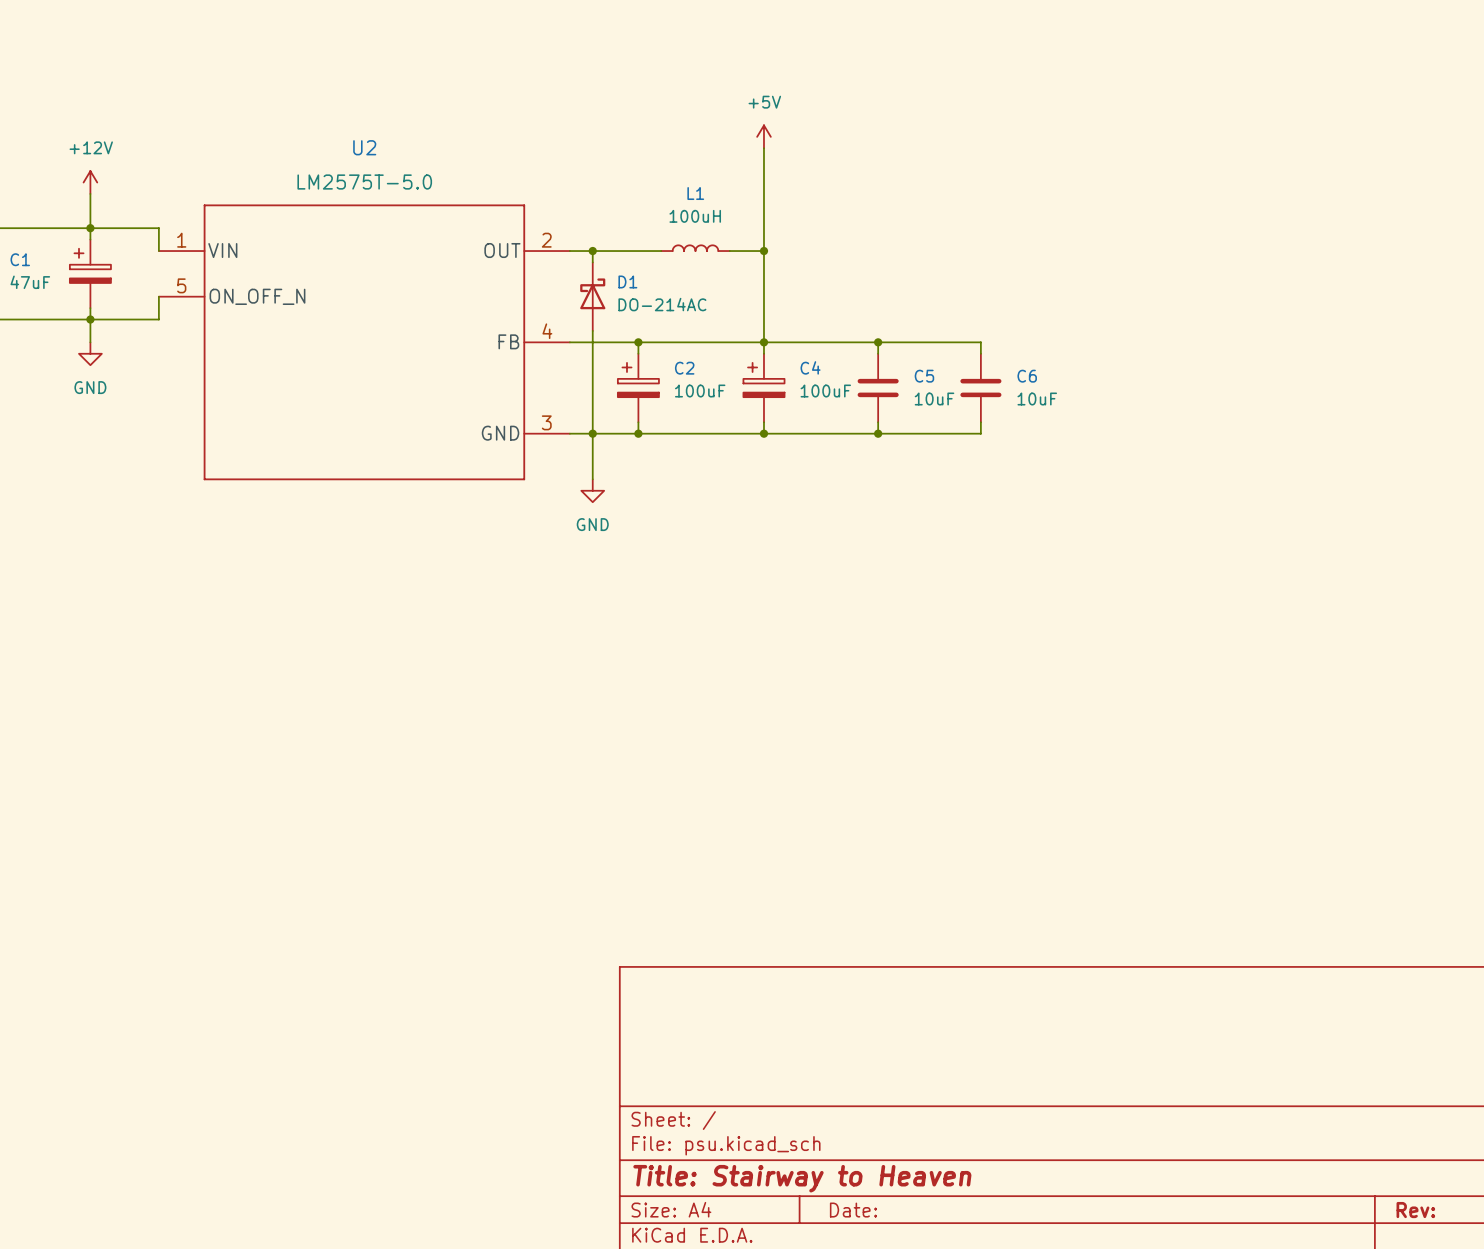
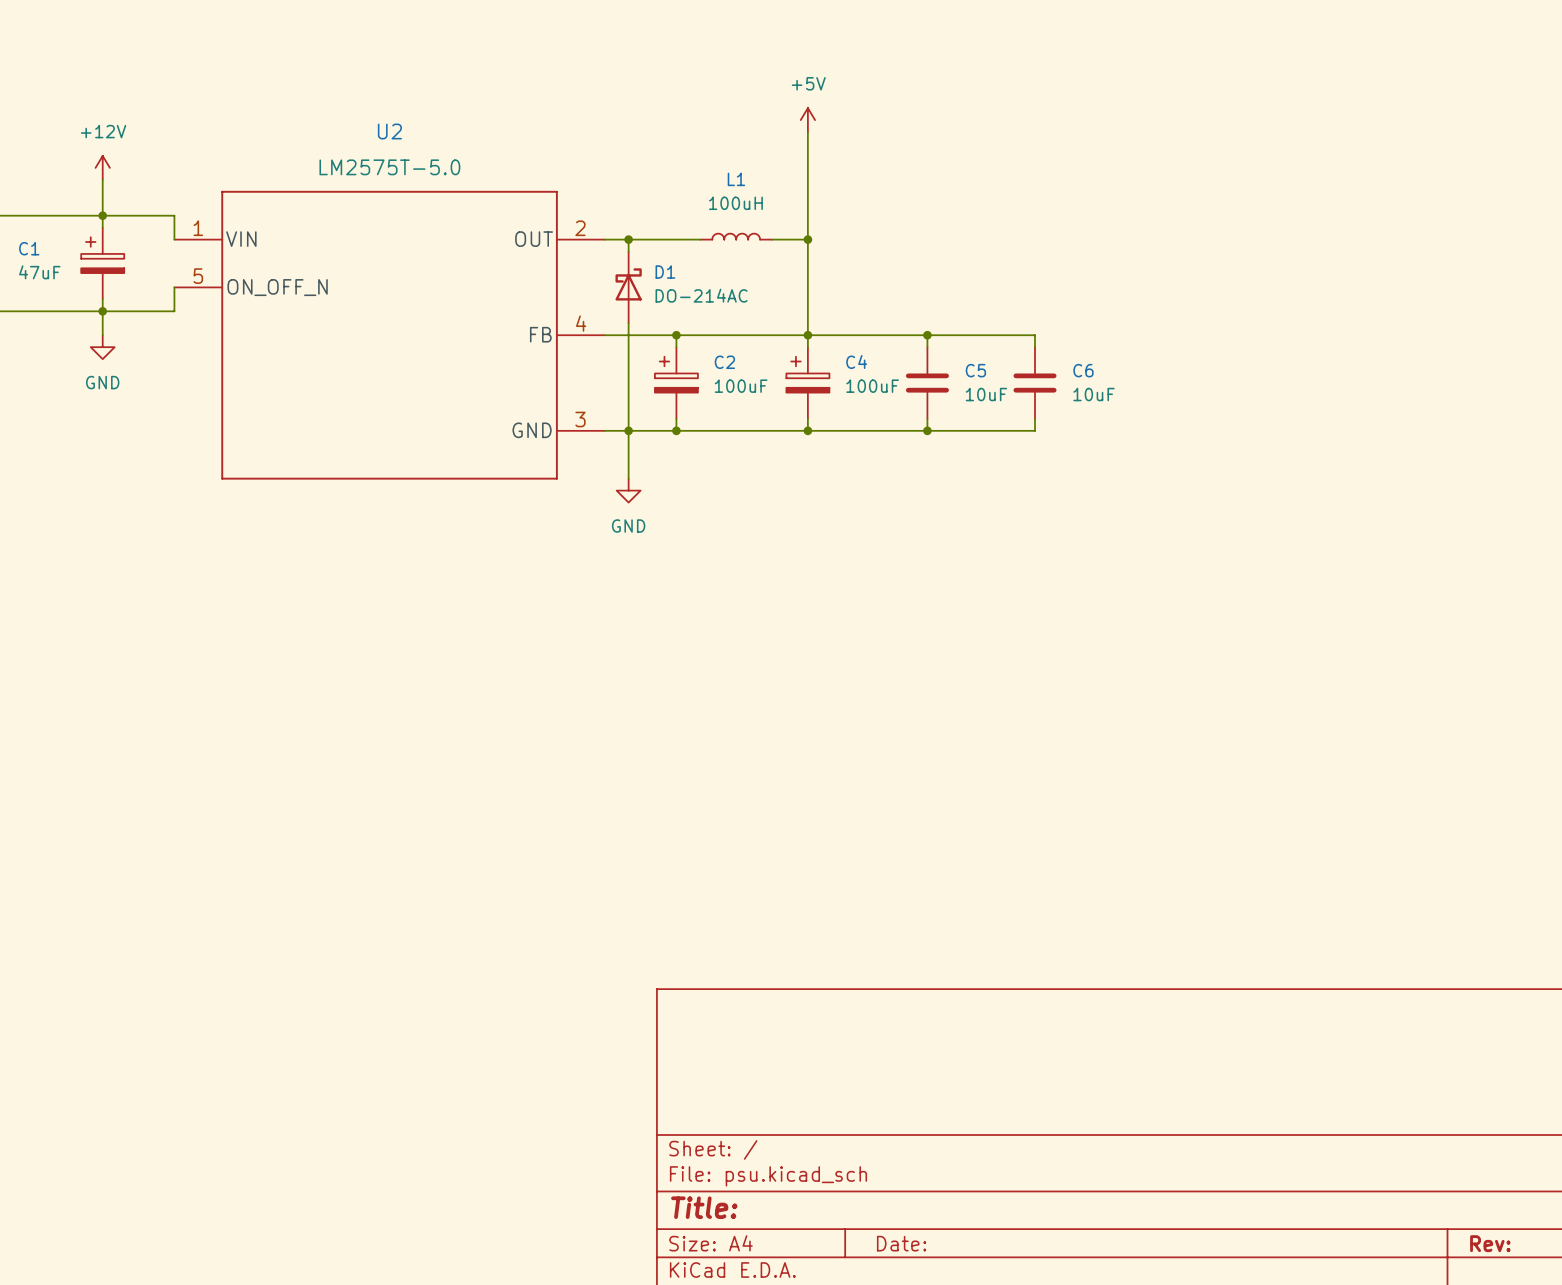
title block: Title: Stairway to Heaven (802, 1178) -> Title: (704, 1207)

